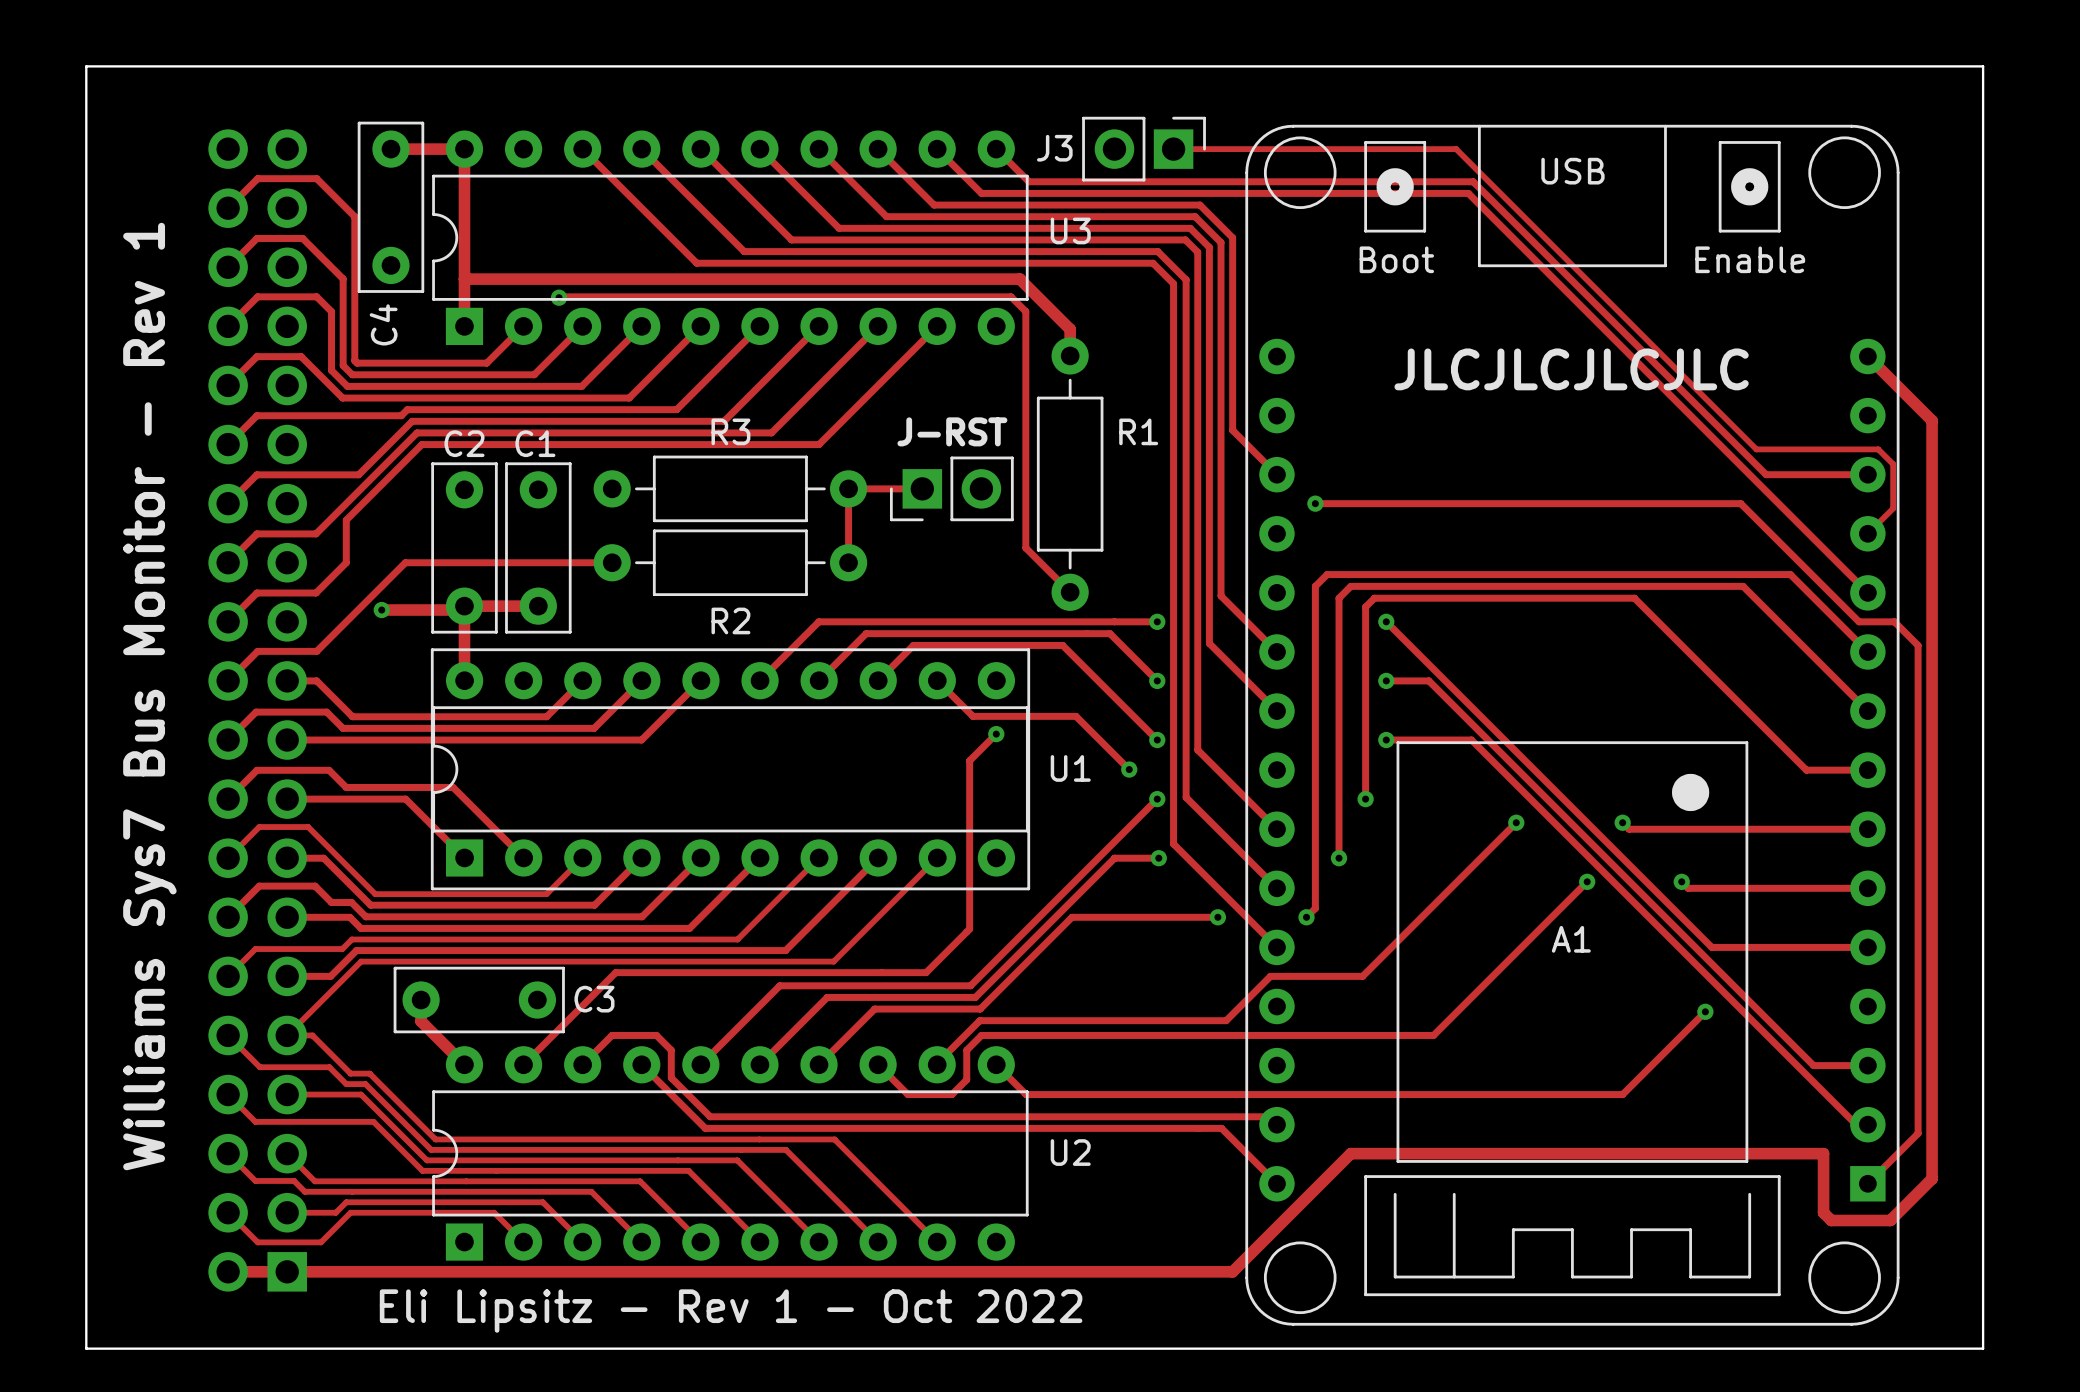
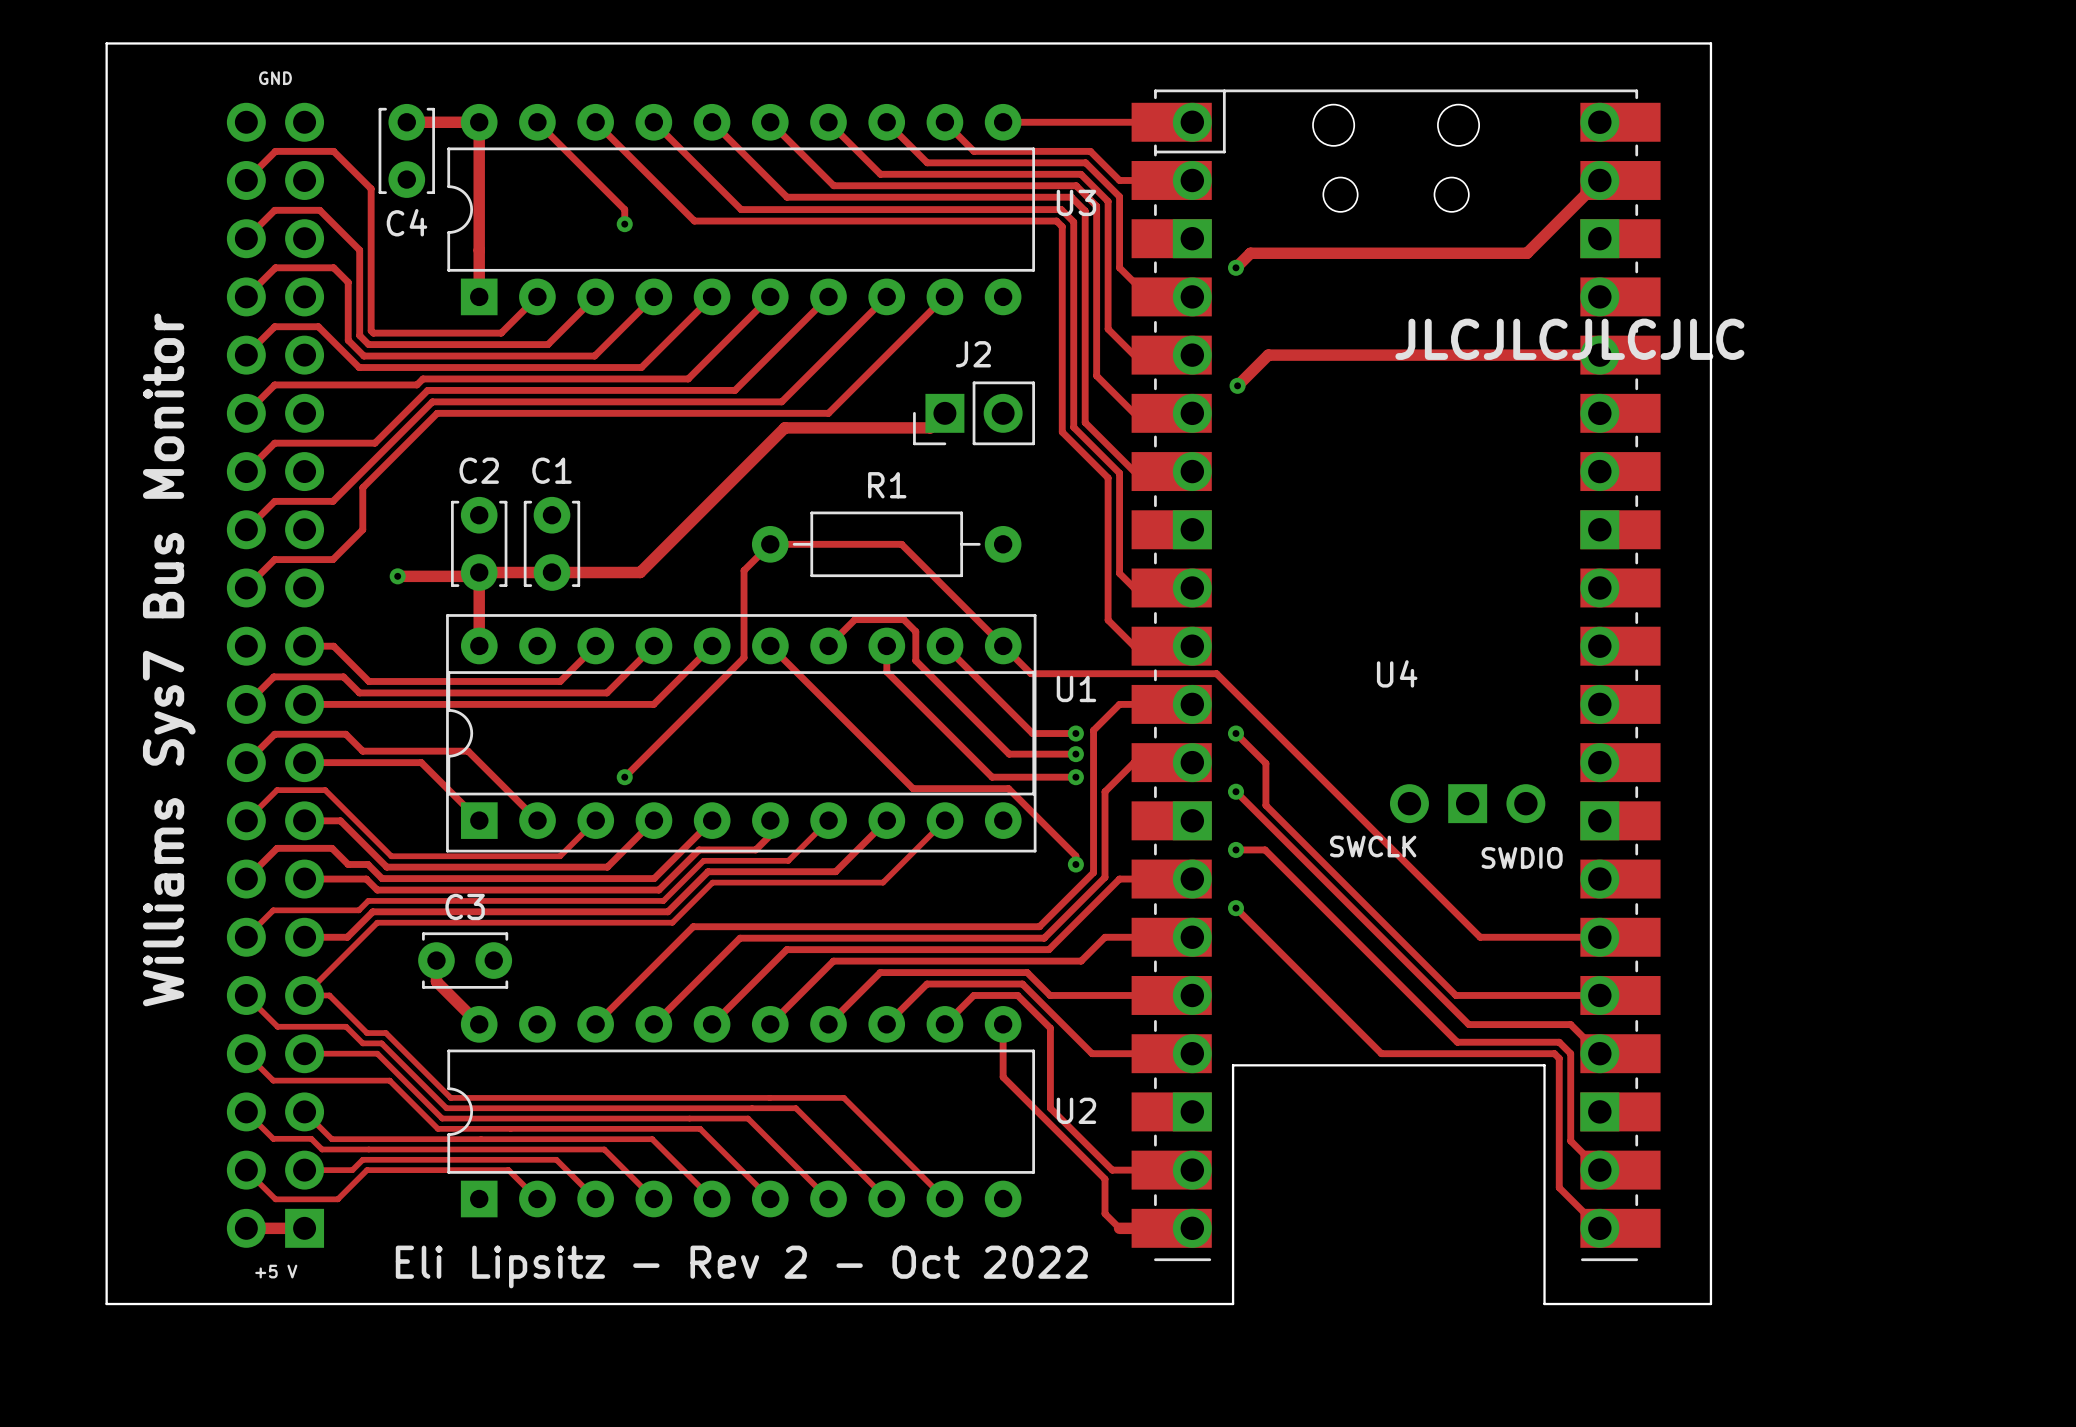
board edge: (86, 69) (86, 66) (1983, 66) (1983, 1348) (1714, 1348) -> (106, 43) (1710, 43) (1710, 1304)
text: none -> GND (275, 78)
C4 footprint: [357, 121, 425, 293] -> [378, 103, 435, 198]
track: none -> (537, 122) (624, 209) (624, 224)
track: (996, 149) (1028, 181) (1473, 181) (1766, 474) (1867, 474) -> (1003, 122) (1177, 122)
J3: (1144, 149) -> none
track: (1188, 149) (1456, 149) (1756, 449) (1878, 449) (1893, 464) (1893, 508) (1867, 533) -> none
track: (966, 178) (981, 193) (1468, 193) (1867, 592) -> (974, 151) (1090, 151) (1119, 180) (1192, 180)
track: (919, 190) (934, 205) (1199, 205) (1232, 237) (1232, 430) (1276, 474) -> (927, 162) (1085, 162) (1119, 196) (1119, 267) (1148, 296) (1192, 296)
track: (871, 201) (886, 216) (1195, 216) (1221, 242) (1221, 596) (1276, 651) -> (880, 174) (1080, 174) (1108, 201) (1108, 329) (1134, 355)
track: none -> (1599, 180) (1527, 253) (1250, 253) (1235, 267)
track: (824, 213) (839, 228) (1190, 228) (1209, 247) (1209, 643) (1276, 711) -> (833, 185) (1076, 185) (1096, 206) (1096, 375) (1134, 413)
track: (776, 225) (791, 239) (1185, 239) (1197, 252) (1197, 750) (1276, 829) -> (787, 197) (1071, 197) (1085, 210) (1085, 422) (1134, 471)
track: (730, 237) (744, 251) (1157, 251) (1186, 279) (1186, 797) (1276, 888) -> (741, 209) (1061, 209) (1073, 221) (1073, 427) (1119, 473) (1119, 573) (1134, 587)
track: (682, 249) (696, 263) (1153, 263) (1173, 283) (1173, 844) (1276, 947) -> (694, 221) (1056, 221) (1062, 226) (1062, 432) (1108, 477) (1108, 620) (1134, 646) (1192, 646)
track: (464, 279) (1019, 279) (1070, 329) (1070, 355) -> none
via: none -> (1235, 267)
track: (559, 297) (1011, 296) (1025, 311) (1025, 547) (1070, 592) -> none
via position: (559, 297) -> (624, 224)
track: (1867, 356) (1932, 420) (1932, 1178) (1890, 1220) (1831, 1220) (1823, 1212) (1823, 1153) (1350, 1153) (1232, 1271) (1188, 1271) -> none
track: none -> (1599, 355) (1268, 355) (1237, 385)
via: none -> (1237, 385)
text: J-RST (952, 431) -> none
R1 name position: R1 (1138, 431) -> R1 (887, 485)
track: none -> (944, 413) (930, 427) (784, 427) (640, 572) (551, 572)
J2: none -> (974, 413)
C2 footprint: [431, 462, 498, 634] -> [451, 496, 508, 591]
C1 footprint: [505, 462, 572, 634] -> [523, 496, 581, 591]
R1 rotation: 0° (1070, 474) -> 90° clockwise (886, 544)
R1 position: (1070, 474) -> (886, 544)
R3: (730, 488) -> none
track: (922, 488) (848, 488) (848, 562) -> none
part: (951, 488) -> none
track: (1315, 503) (1740, 503) (1859, 621) (1894, 621) (1918, 645) (1918, 1133) (1867, 1183) -> none
via: (1315, 503) -> none
track: (612, 562) (405, 562) (316, 651) (257, 651) (228, 680) -> none
R2: (730, 562) -> none
track: (1129, 621) (818, 621) (760, 680) -> (1075, 864) (1075, 855) (1008, 788) (913, 788) (770, 645)
via: (1157, 621) -> none
track: (1386, 621) (1711, 947) (1867, 947) -> none
via: (1386, 621) -> none
track: (1867, 651) (1790, 574) (1327, 574) (1315, 586) (1315, 908) (1306, 917) -> none
track: (845, 653) (866, 633) (1110, 633) (1157, 680) -> (854, 619) (903, 619) (915, 631) (915, 660) (1009, 754) (1075, 754)
track: (878, 680) (913, 645) (1062, 645) (1157, 740) -> (886, 645) (886, 671) (992, 777) (1075, 777)
via: (1157, 680) -> none
track: (1386, 680) (1428, 680) (1813, 1065) (1867, 1065) -> none
via: (1386, 680) -> none
text: Williams Sys7 Bus Monitor - Rev 1 (149, 696) -> Williams Sys7 Bus Monitor (169, 659)
U4: none -> (1396, 675)
track: (1867, 711) (1743, 586) (1350, 586) (1339, 598) (1339, 858) -> none
track: (973, 716) (1076, 716) (1129, 769) -> (980, 681) (1032, 733) (1075, 733)
A1: (1572, 725) -> none
track: (996, 734) (969, 760) (969, 929) (926, 972) (615, 972) (523, 1064) -> none
via: (996, 734) -> none
via: (1157, 740) -> none
track: (1386, 740) (1471, 740) (1856, 1124) (1867, 1124) -> none
via: (1386, 740) -> none
U1 name position: U1 (1070, 768) -> U1 (1076, 689)
via: none -> (1075, 733)
via: (1129, 769) -> none
track: none -> (1235, 733) (1265, 763) (1265, 805) (1455, 995) (1599, 995)
via: none -> (1235, 733)
track: (1867, 770) (1806, 770) (1634, 598) (1374, 598) (1365, 607) (1365, 799) -> none
via: none -> (1075, 754)
track: (1157, 799) (970, 985) (779, 985) (776, 988) -> none
via: (1157, 799) -> none
via: (1365, 799) -> none
track: none -> (624, 777) (744, 657) (744, 570) (770, 544) (901, 544) (1030, 673) (1216, 673) (1480, 937) (1599, 937)
via: none -> (624, 777)
via: none -> (1075, 777)
track: (1516, 822) (1362, 976) (1270, 976) (1226, 1020) (979, 1020) (937, 1064) -> none
via: (1516, 822) -> none
track: (1622, 822) (1629, 829) (1867, 829) -> none
via: (1622, 822) -> none
track: none -> (1235, 791) (1468, 1024) (1570, 1024) (1599, 1053)
via: none -> (1235, 791)
track: (760, 857) (689, 928) (646, 928) -> (770, 820) (770, 835) (755, 849) (699, 849) (658, 890)
track: (1158, 858) (1114, 858) (975, 997) (827, 997) (824, 1000) -> (1192, 937) (1105, 937) (1081, 961) (833, 961)
via: (1158, 858) -> none
via: (1339, 858) -> none
track: (1587, 881) (1433, 1035) (1188, 1035) -> none
via: (1587, 881) -> none
track: (1681, 881) (1688, 888) (1867, 888) -> none
via: (1681, 881) -> none
track: none -> (1235, 849) (1265, 849) (1457, 1042) (1559, 1042) (1570, 1053) (1570, 1141) (1599, 1170)
via: none -> (1235, 849)
track: (778, 898) (737, 939) (651, 939) -> (788, 860) (703, 860) (663, 900)
via: none -> (1075, 864)
track: (826, 909) (785, 950) (656, 950) -> (835, 871) (708, 871) (667, 911)
track: (1114, 917) (1072, 917) (980, 1009) (874, 1009) (871, 1012) -> (1119, 879) (1048, 949) (786, 949)
track: (1188, 917) (1217, 917) -> none
via: (1217, 917) -> none
via: (1306, 917) -> none
track: (874, 920) (833, 961) (660, 961) -> (883, 882) (712, 882) (672, 922)
via: none -> (1235, 908)
C3 footprint: [393, 966, 565, 1034] -> [418, 932, 513, 989]
C3 name position: C3 (594, 999) -> C3 (465, 906)
track: (1705, 1011) (1622, 1094) (1555, 1094) -> (1599, 1228) (1559, 1187) (1559, 1058) (1554, 1053)
via: (1705, 1011) -> none
track: (611, 1035) (656, 1035) (671, 1050) (671, 1077) (710, 1116) (1269, 1116) (1276, 1124) -> (624, 995) (693, 926) (1039, 926) (1093, 872) (1093, 730) (1119, 704) (1192, 704)
track: (981, 1035) (966, 1050) (966, 1079) (951, 1094) (907, 1094) (878, 1064) -> (988, 995) (973, 995) (944, 1024)
track: (1011, 1035) (1043, 1035) -> (880, 972) (1027, 972) (1050, 995)
track: none -> (1017, 995) (1050, 1028) (1050, 1108) (1112, 1170) (1192, 1170)
track: (641, 1064) (705, 1128) (1221, 1128) (1276, 1183) -> (653, 1024) (740, 938) (1044, 938) (1105, 877) (1105, 791) (1134, 762) (1192, 762)
track: (996, 1064) (1026, 1094) (1086, 1094) -> (886, 1024) (927, 984) (1022, 984) (1092, 1053)
track: (1188, 1094) (1380, 1094) -> (1235, 908) (1381, 1053)
track: (287, 1271) (1114, 1271) -> (1003, 1024) (1003, 1077) (1105, 1179) (1105, 1213) (1119, 1228)
text: Eli Lipsitz - Rev 1 - Oct 2022 (731, 1311) -> Eli Lipsitz - Rev 2 - Oct 2022 (741, 1266)
text: none -> +5 V (276, 1271)
board edge: (1229, 1348) (1545, 1348) -> (1233, 1304) (1233, 1065) (1544, 1065) (1544, 1304)

